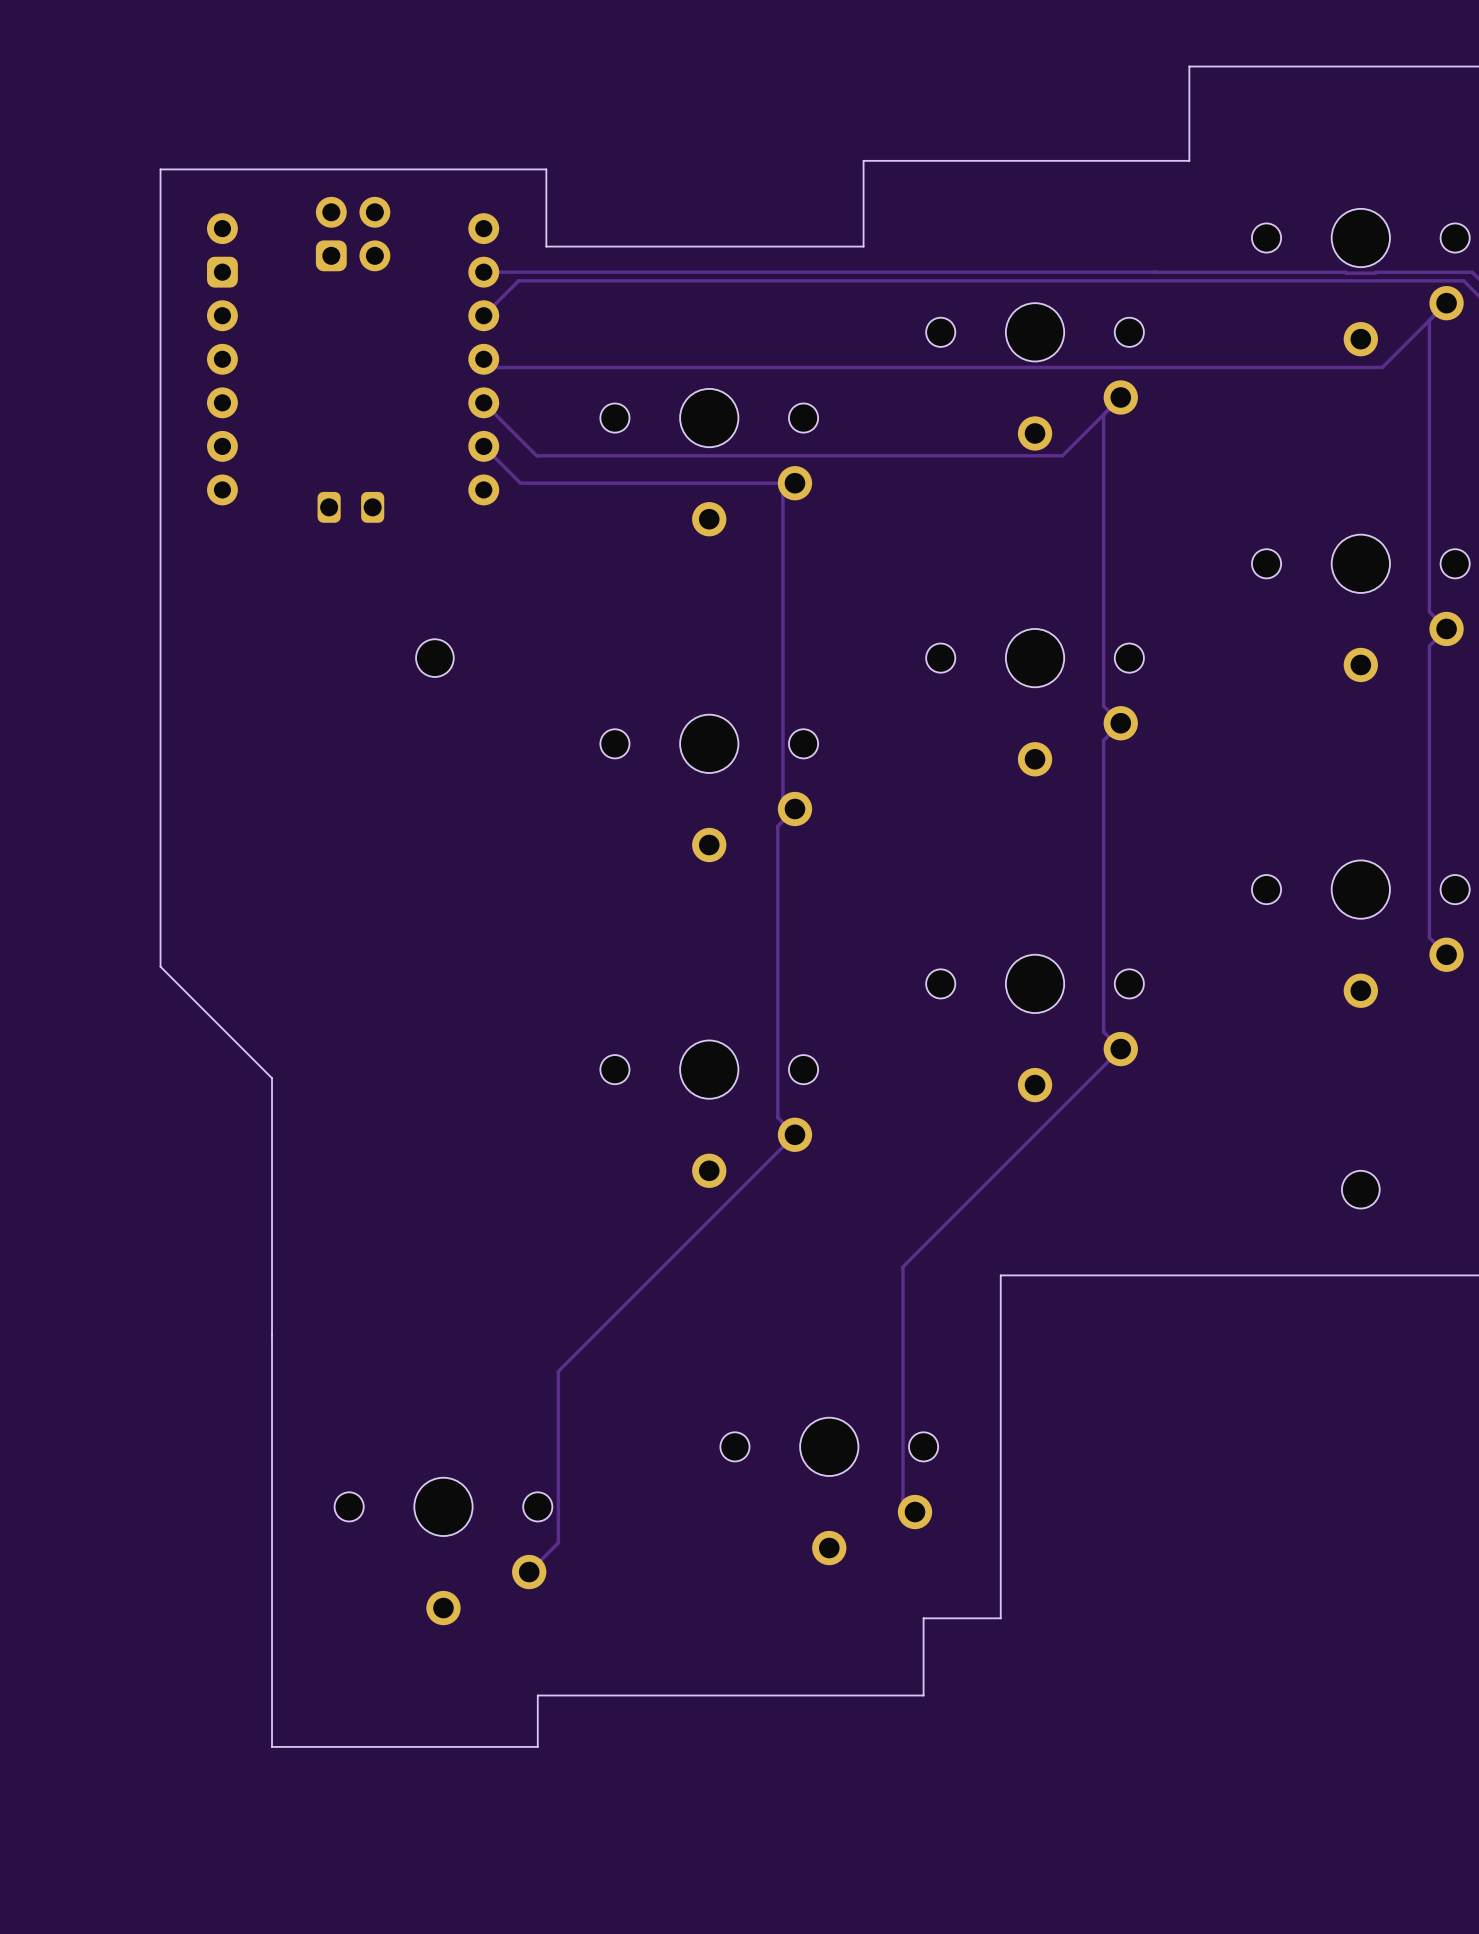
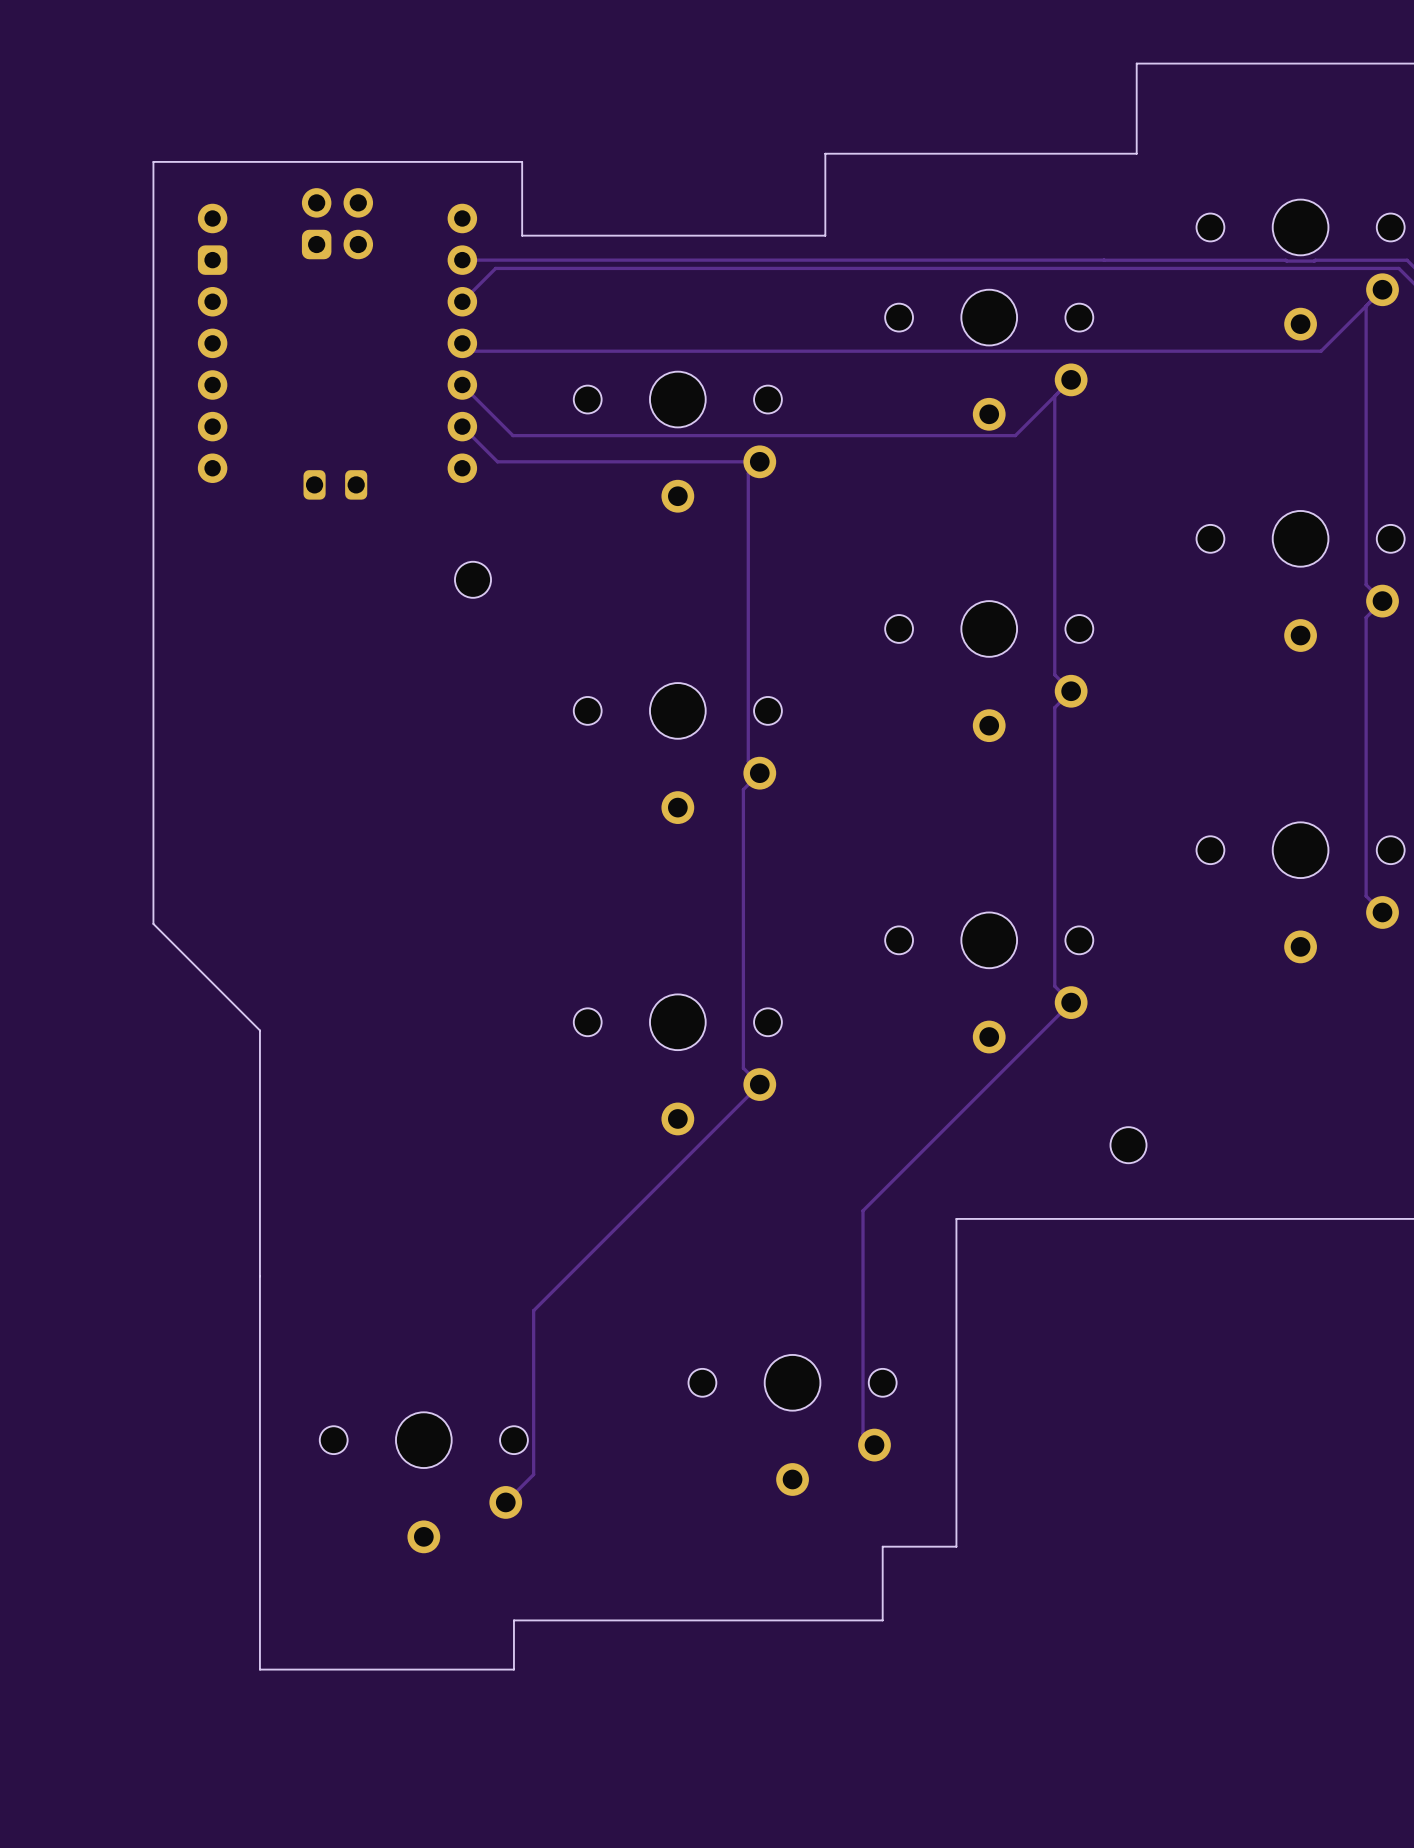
part position: (434, 658) -> (473, 579)
part position: (1360, 1189) -> (1128, 1145)

